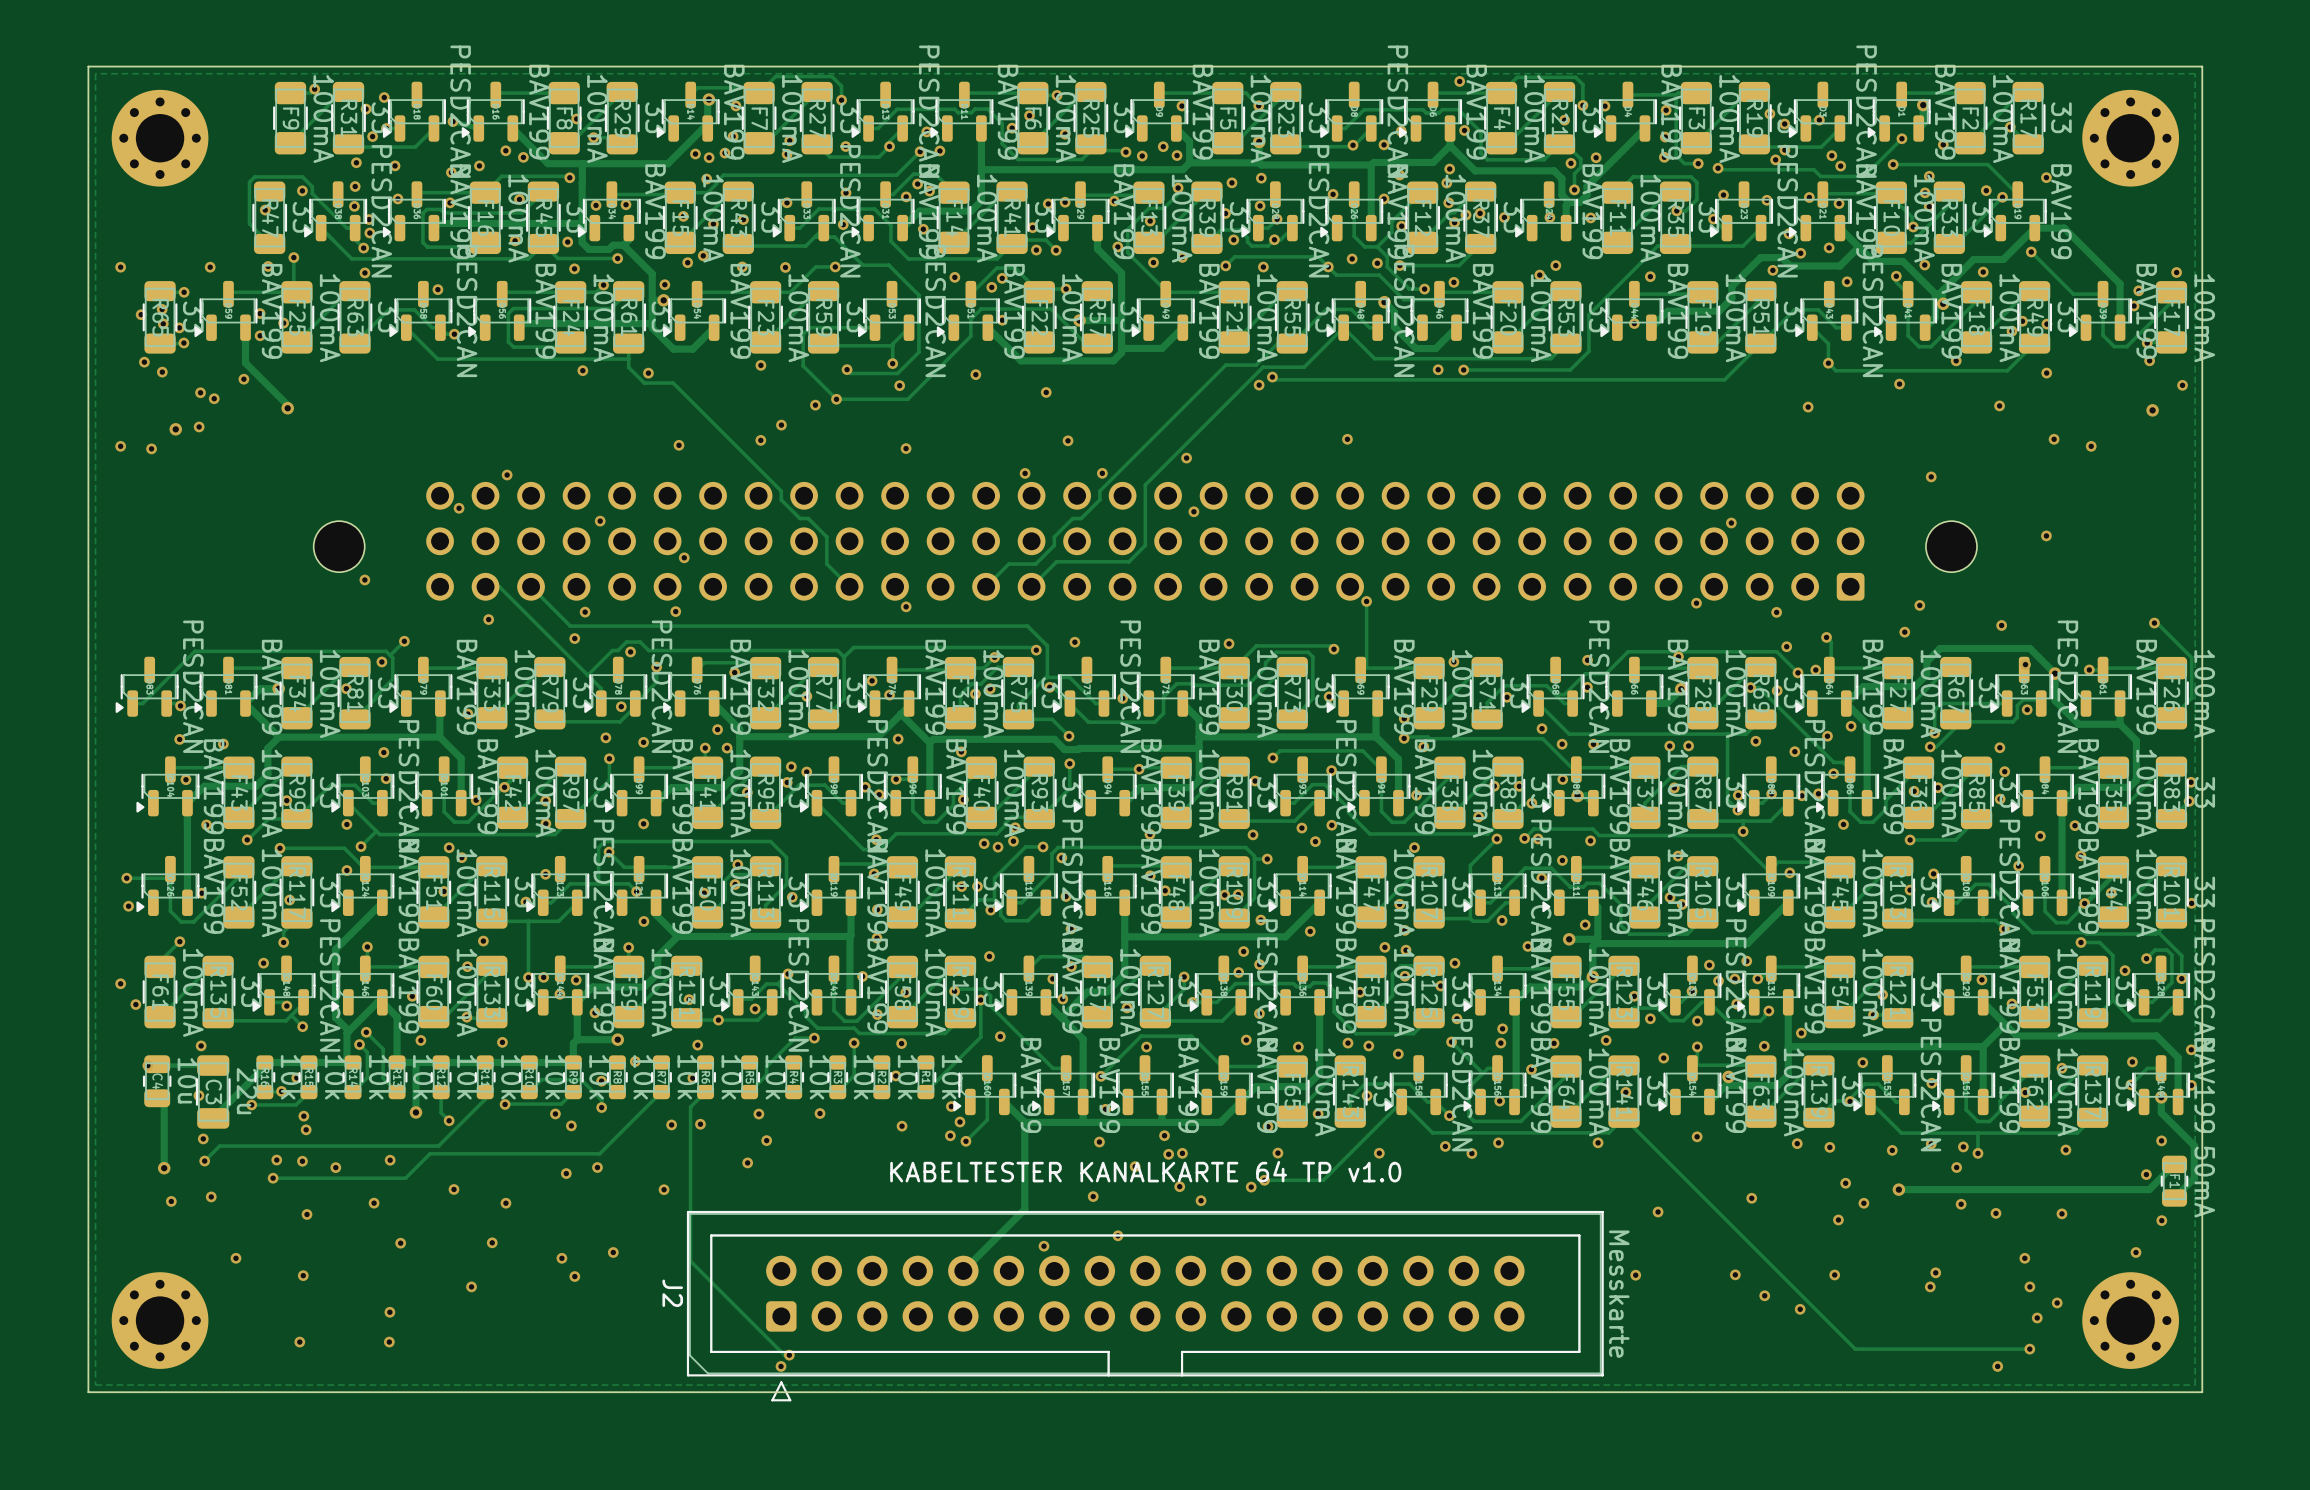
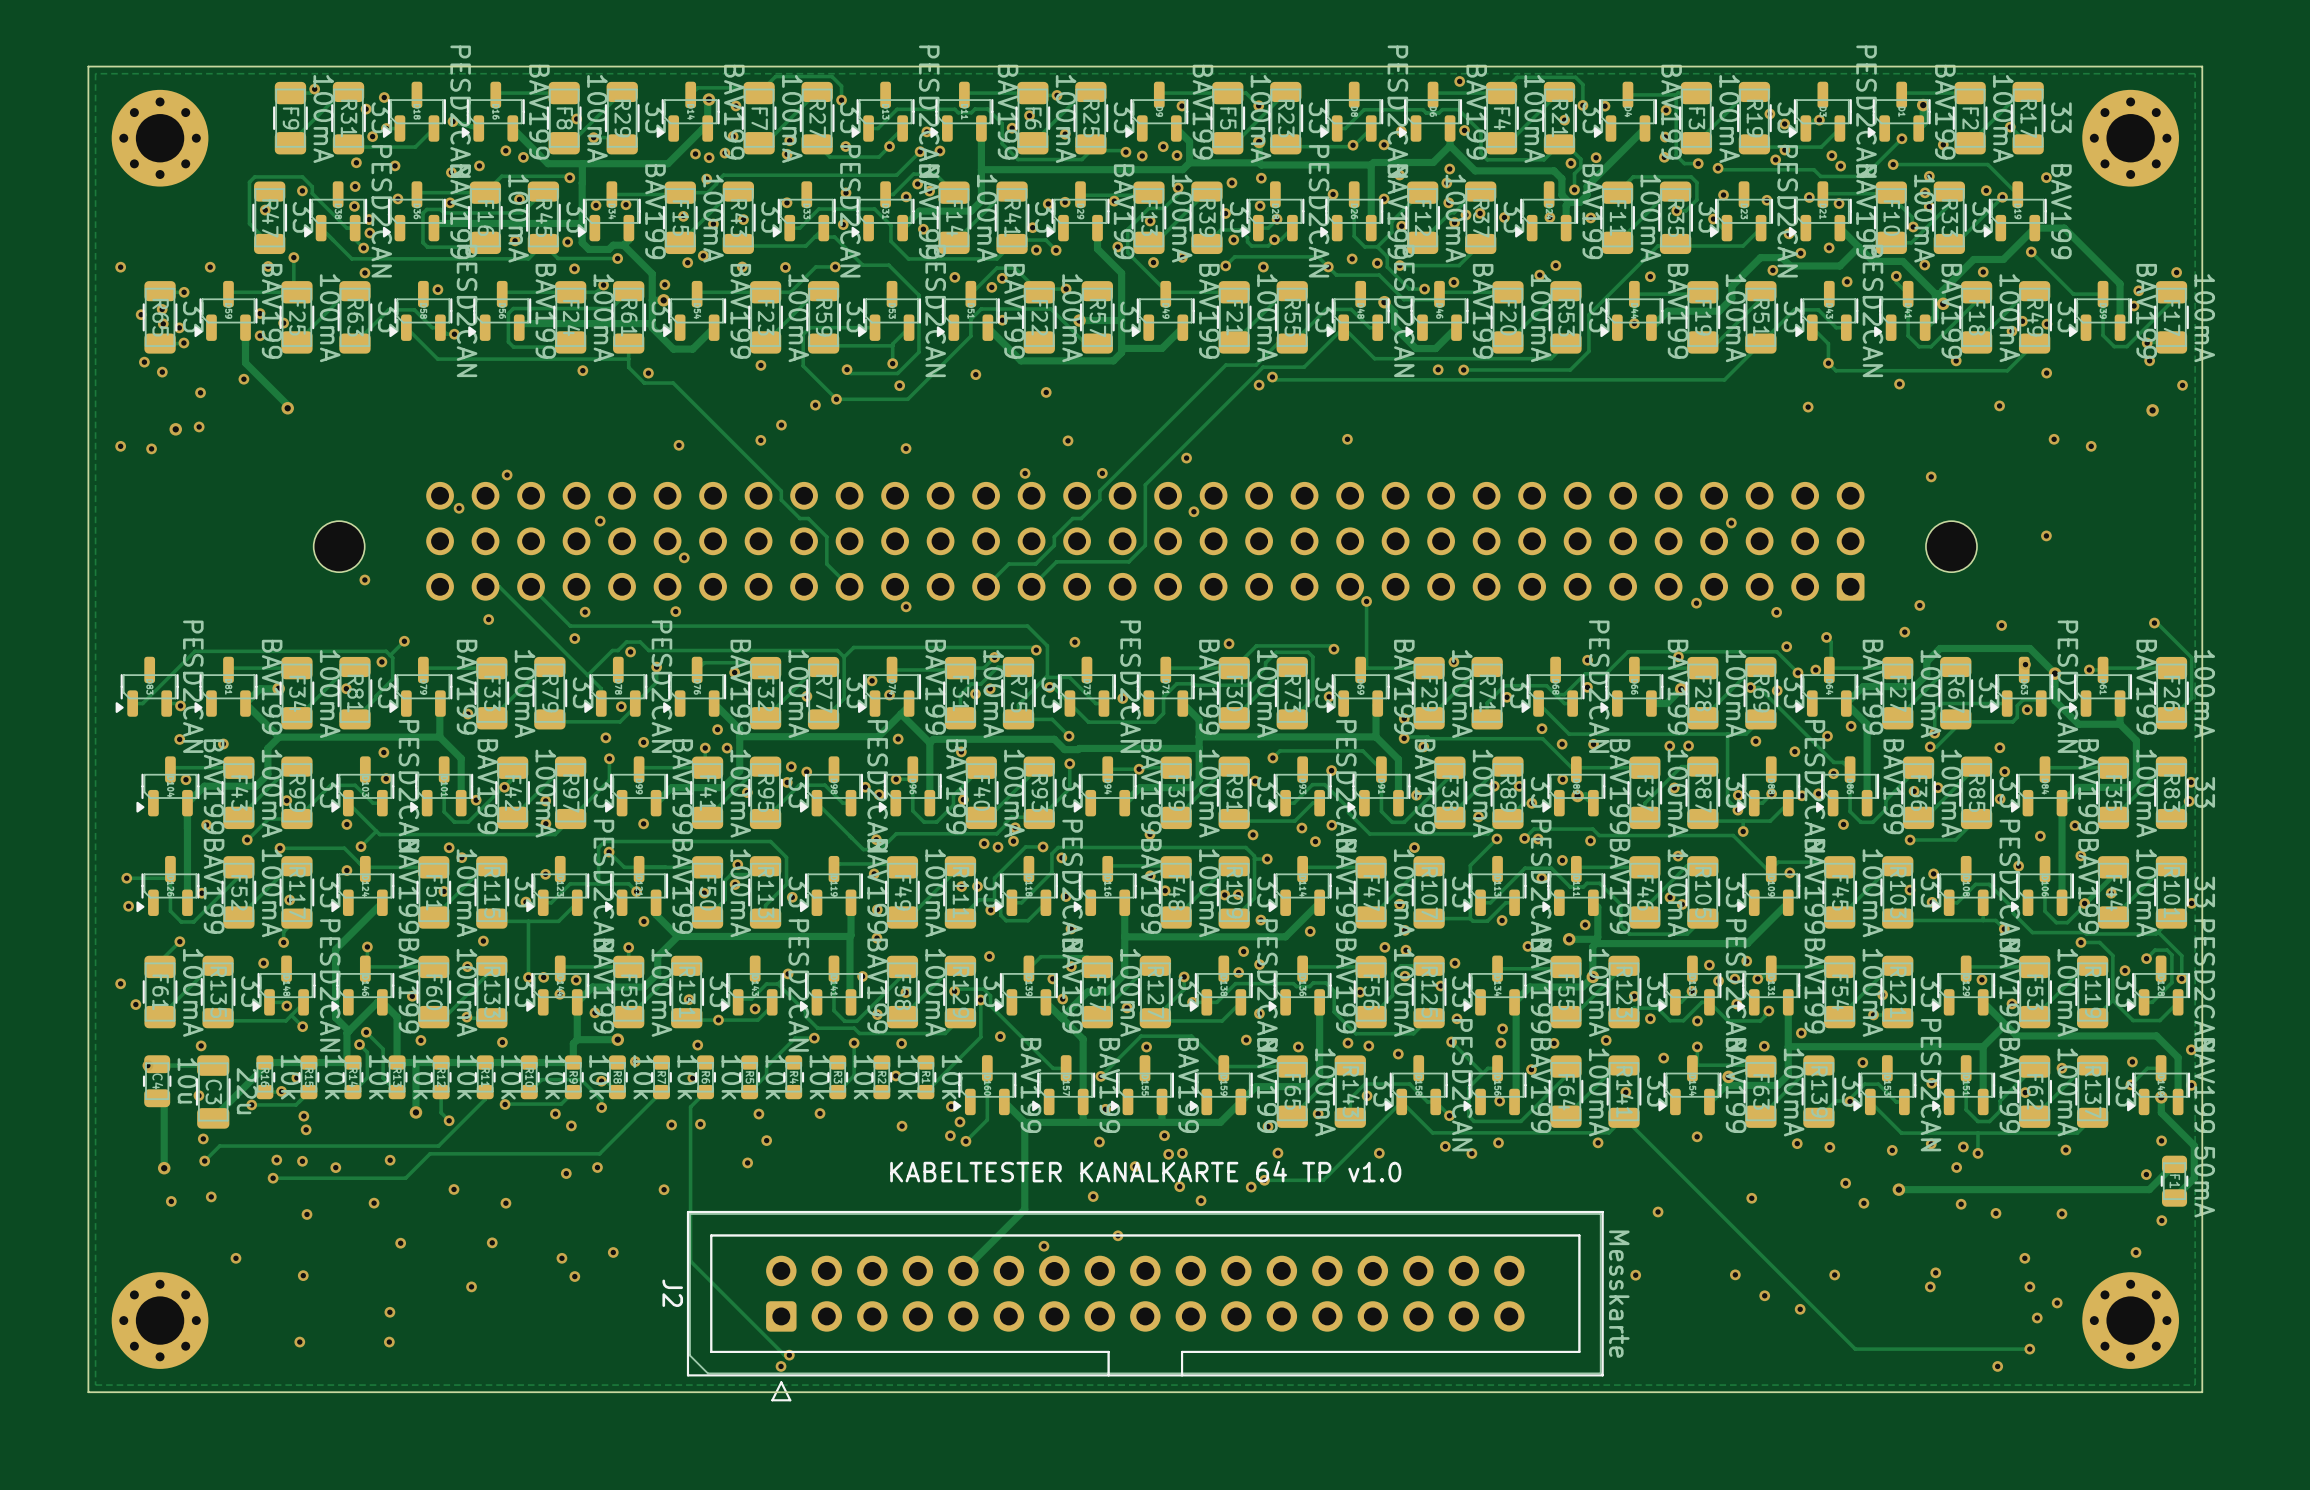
via: (214, 398) -> none
via: (1838, 1219) -> none

